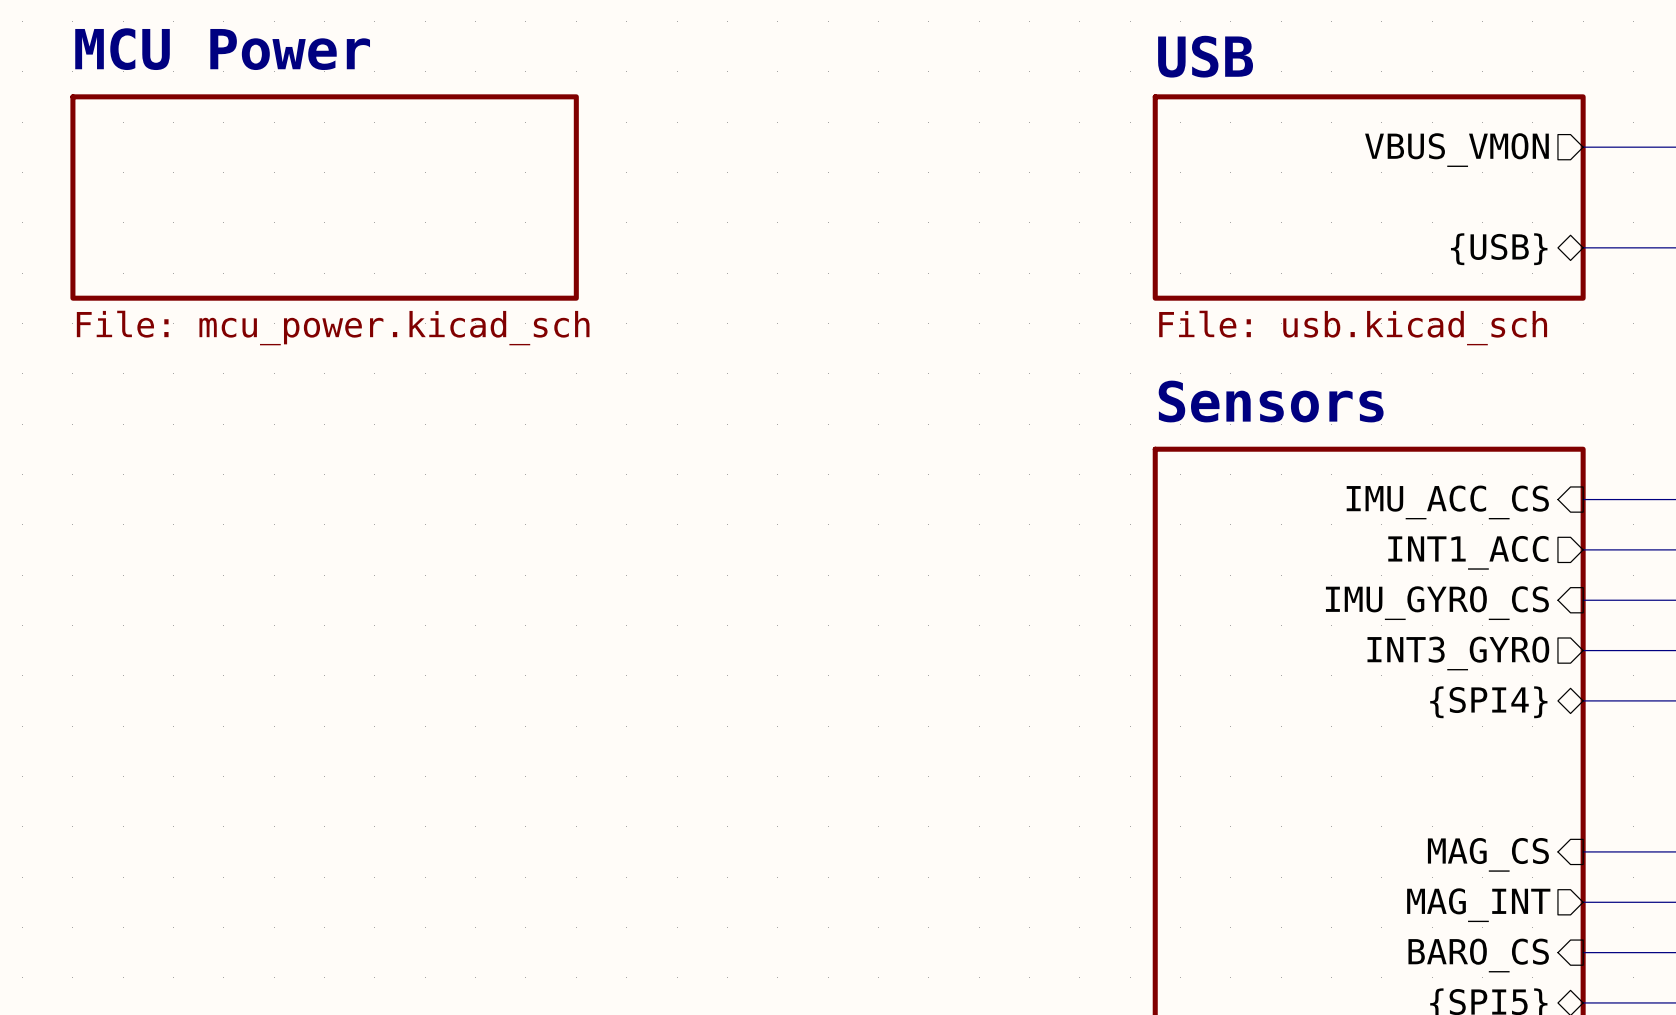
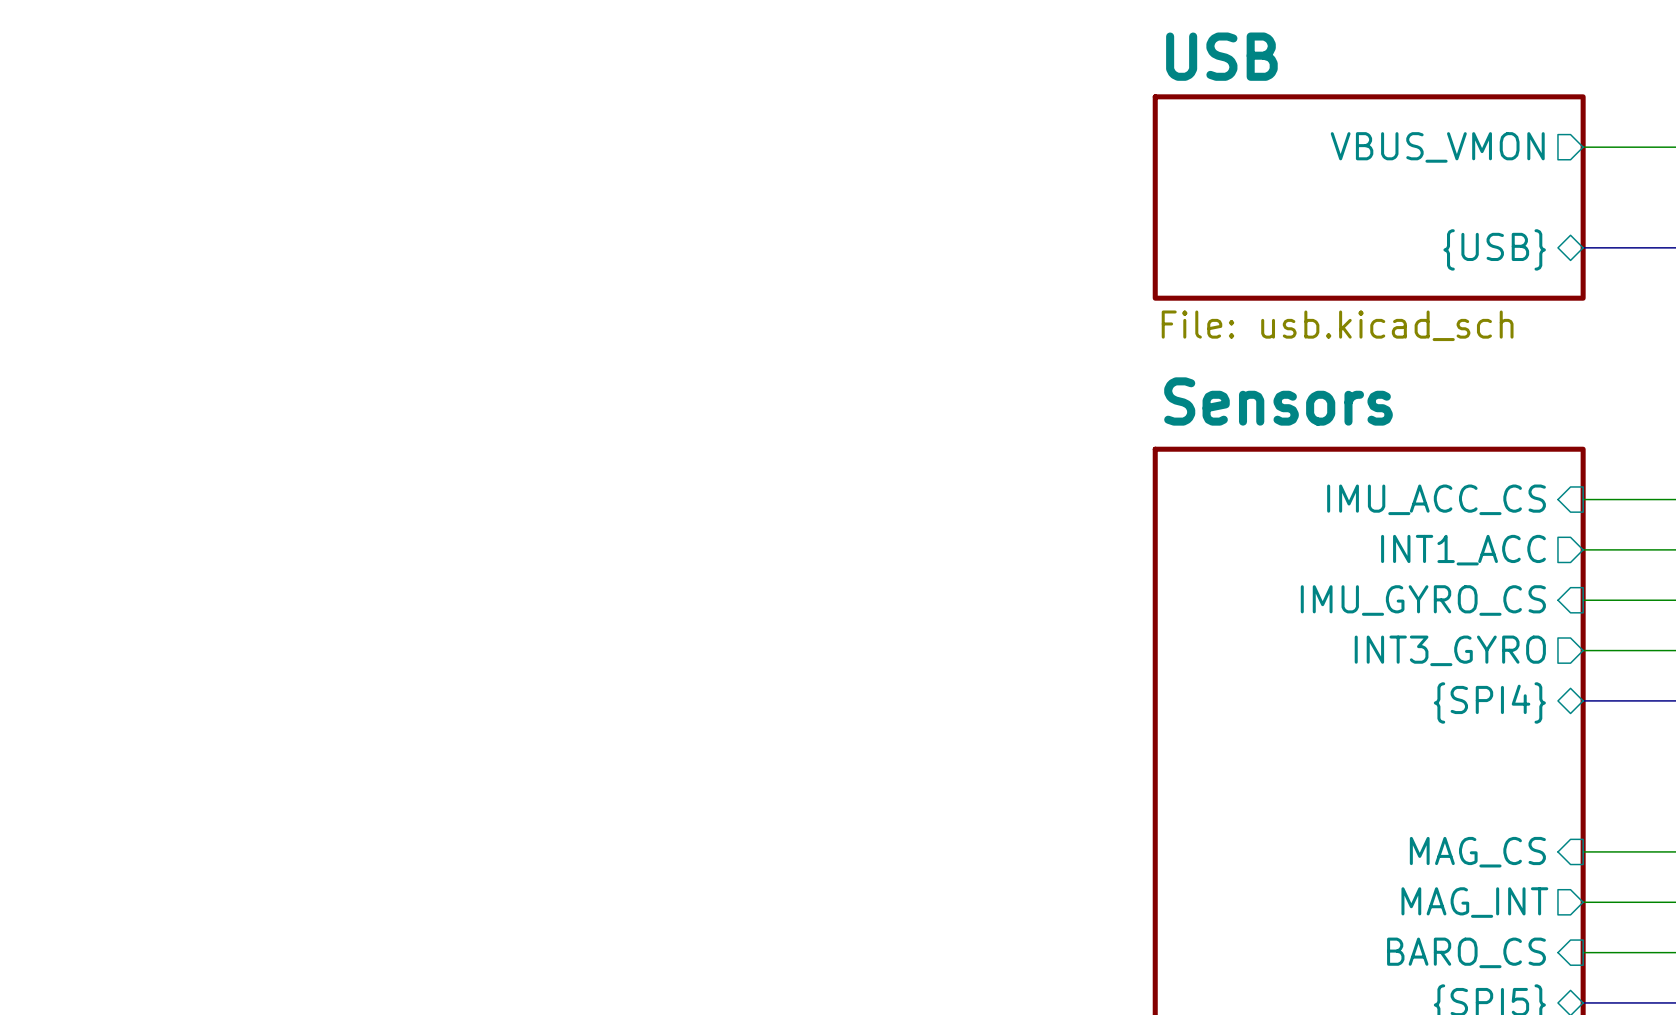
sheet MCU Power: File: mcu_power.kicad_sch (324, 197) -> none

